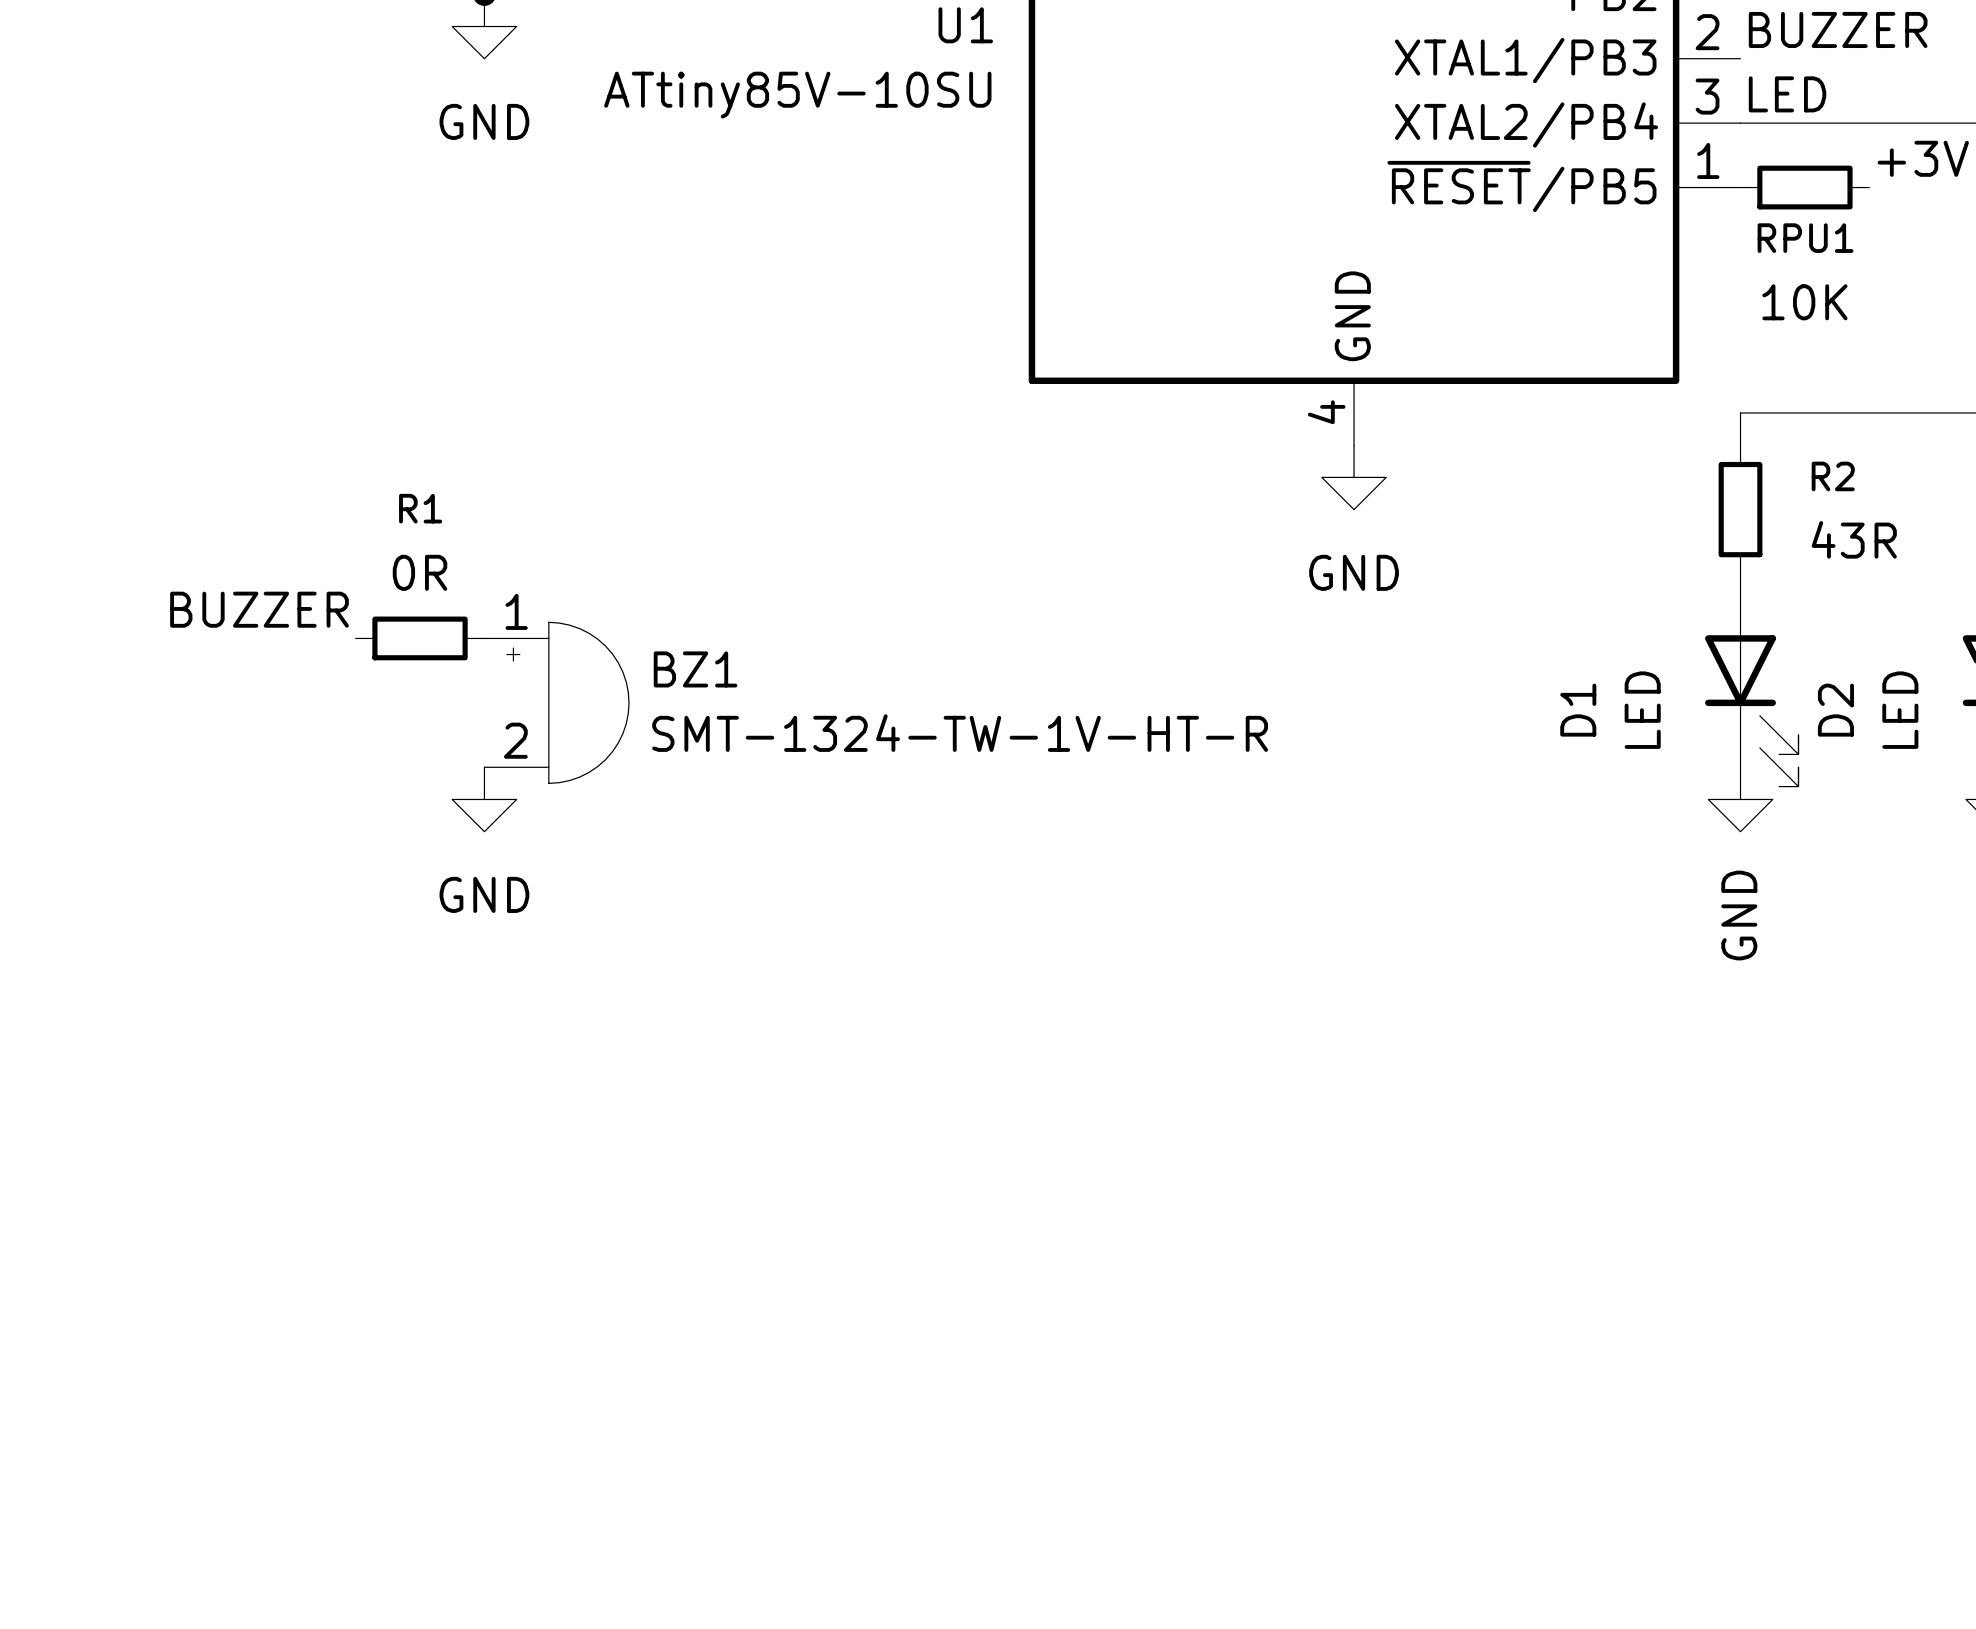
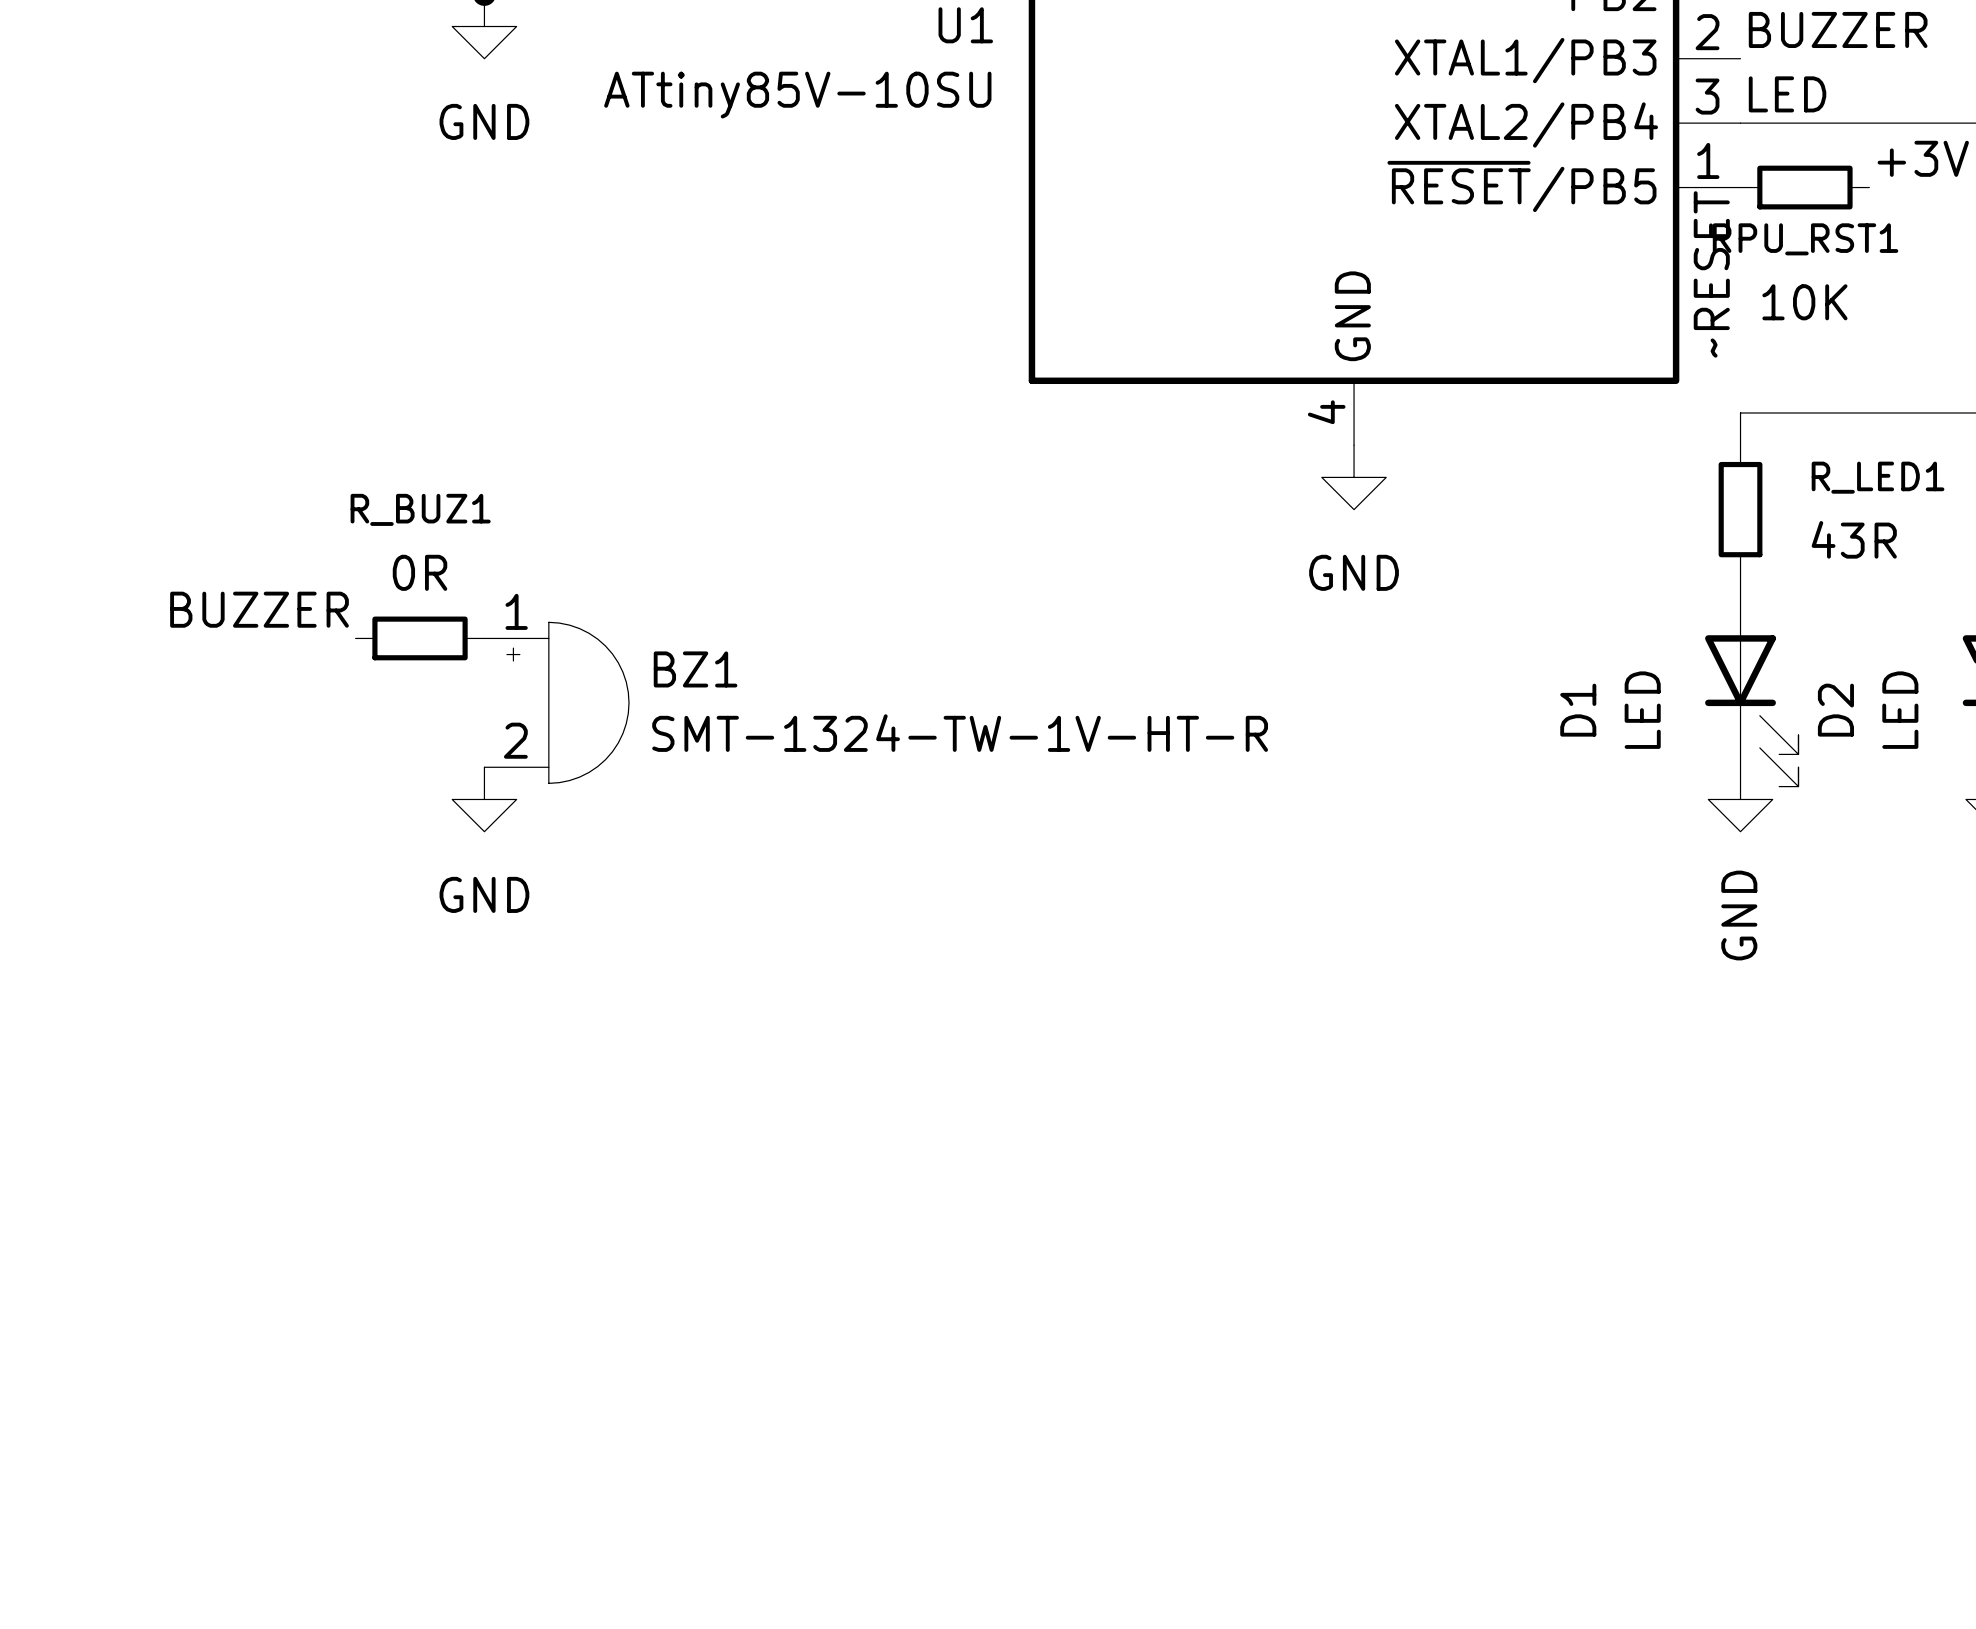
RPU1 name: RPU1 (1805, 238) -> RPU_RST1 (1805, 239)
label: none -> ~RESET (1711, 274)
R2 name: R2 (1833, 476) -> R_LED1 (1878, 477)
R1 name: R1 (420, 508) -> R_BUZ1 (420, 509)

